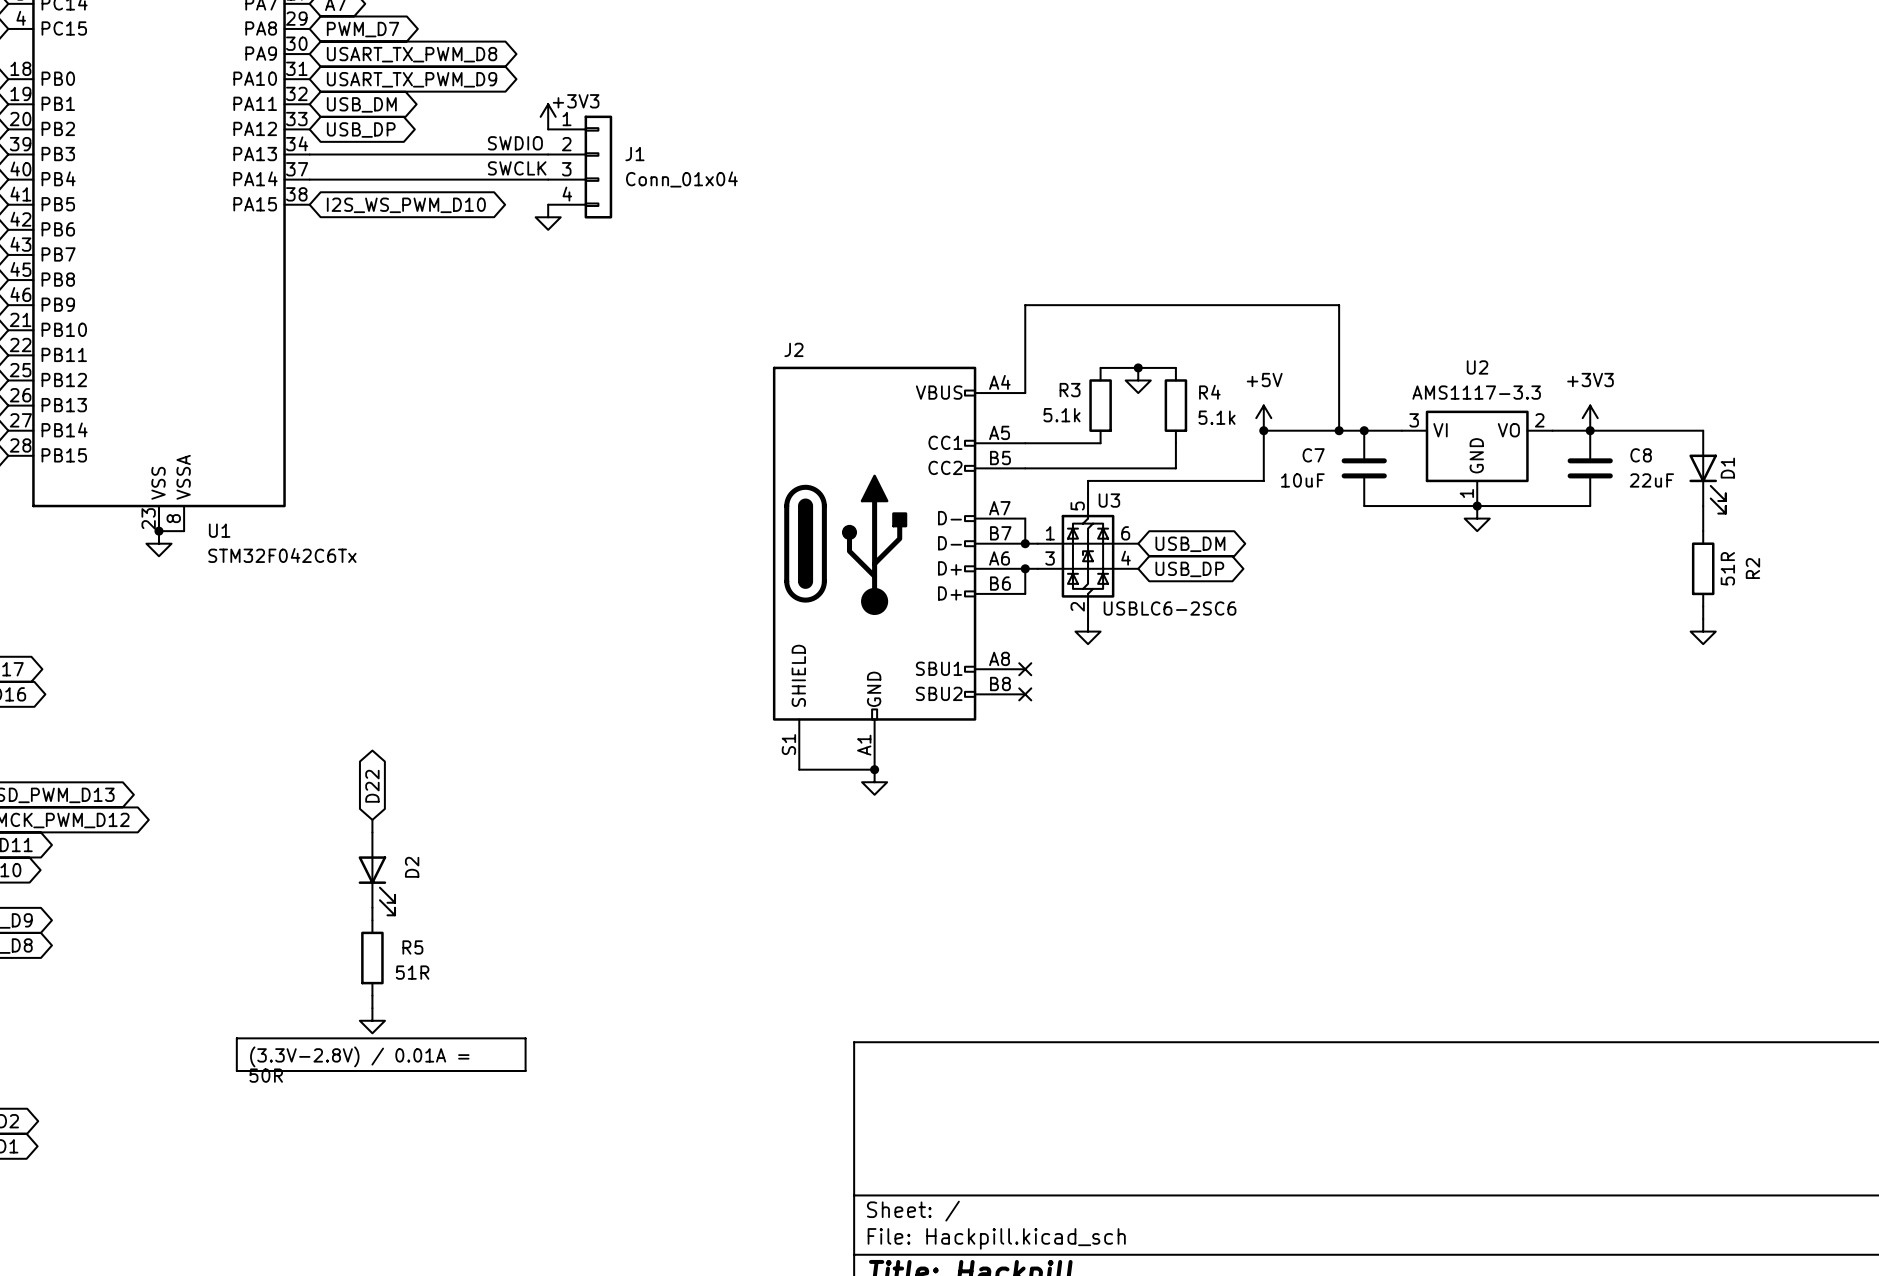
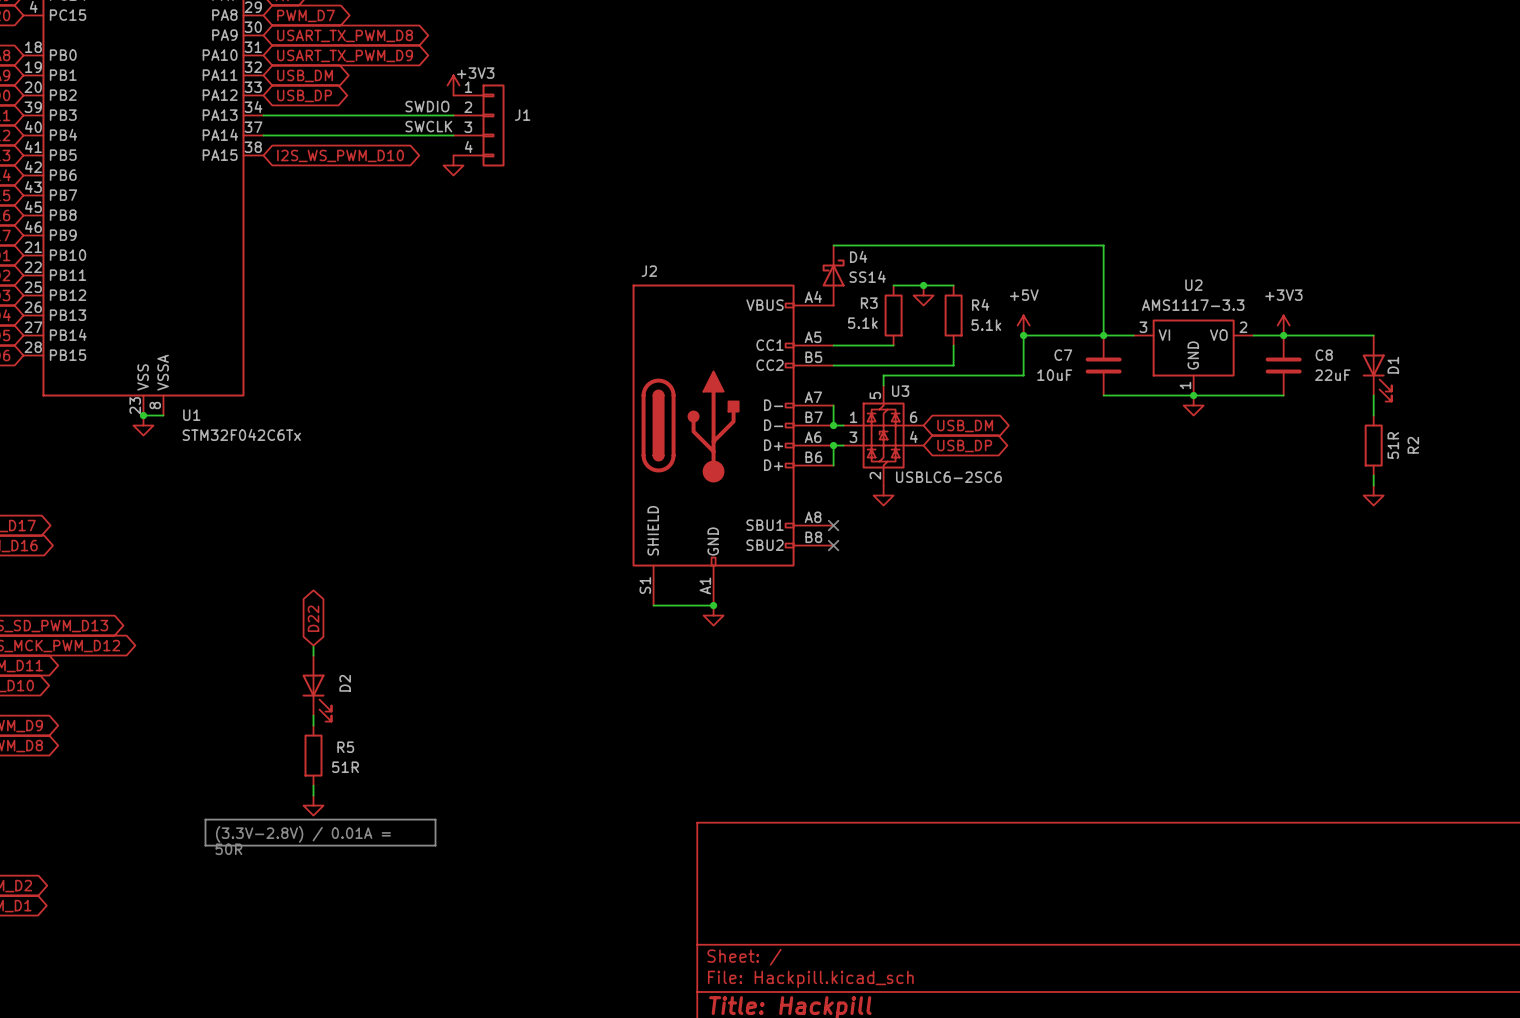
J1 value: Conn_01x04 (681, 179) -> none
wire: none -> (833, 245) (1103, 245) (1103, 335)
D4: none -> SS14 (833, 275)
wire: (1025, 393) (1025, 305) (1339, 305) (1339, 430) -> none
junction: (1339, 430) -> none

